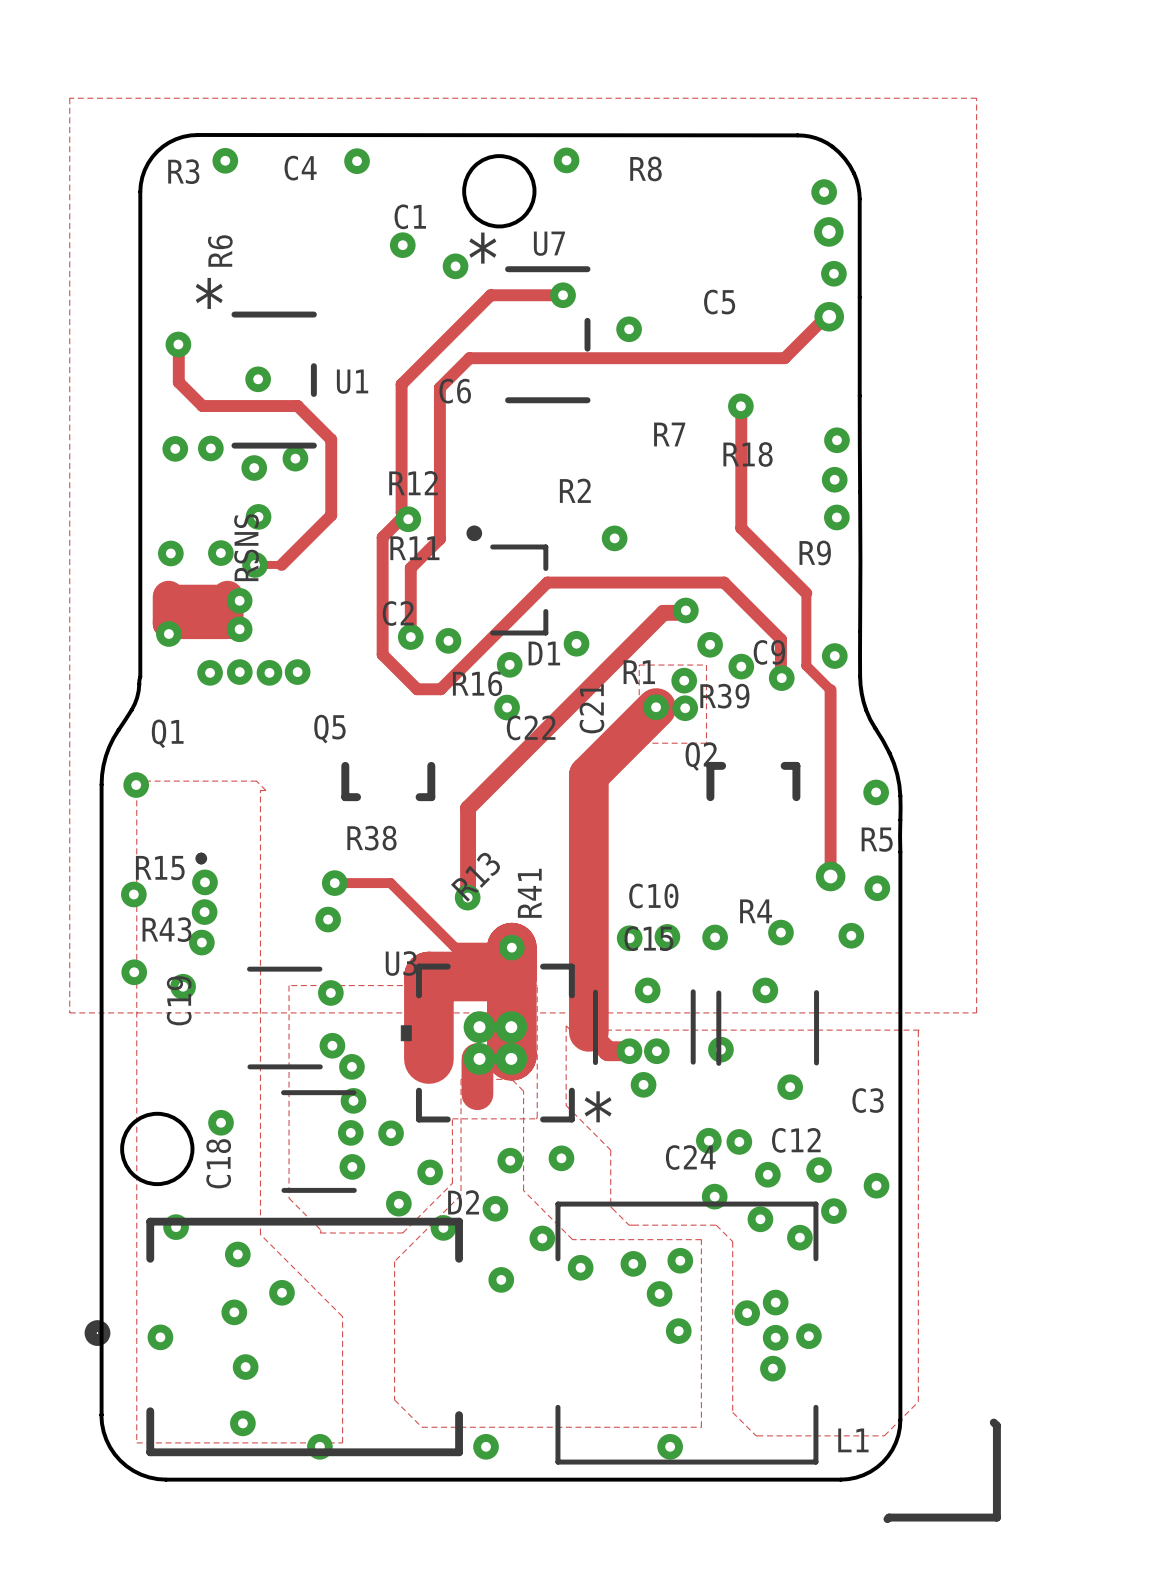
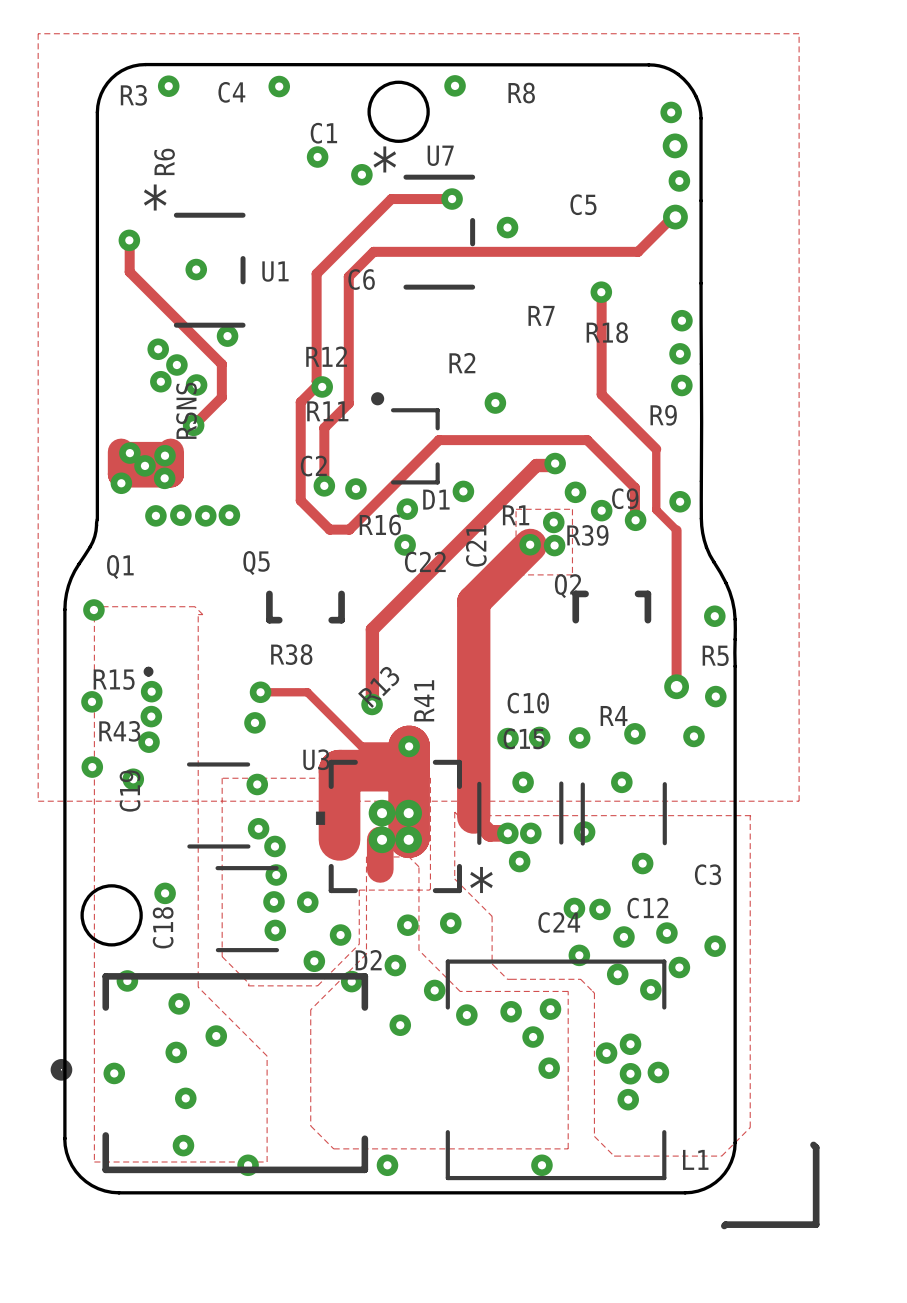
track: (202, 406) (297, 406) (331, 439) (331, 515) (281, 564) (255, 564) -> (149, 291) (221, 364) (221, 397) (193, 425)
via: (175, 448) -> none
via: (210, 448) -> none
via position: (254, 468) -> (176, 364)
via: none -> (158, 349)
via: none -> (160, 381)
via: (170, 553) -> none
via: (220, 553) -> none
via: none -> (129, 453)
via position: (239, 600) -> (164, 455)
via: none -> (144, 465)
via position: (239, 629) -> (164, 478)

